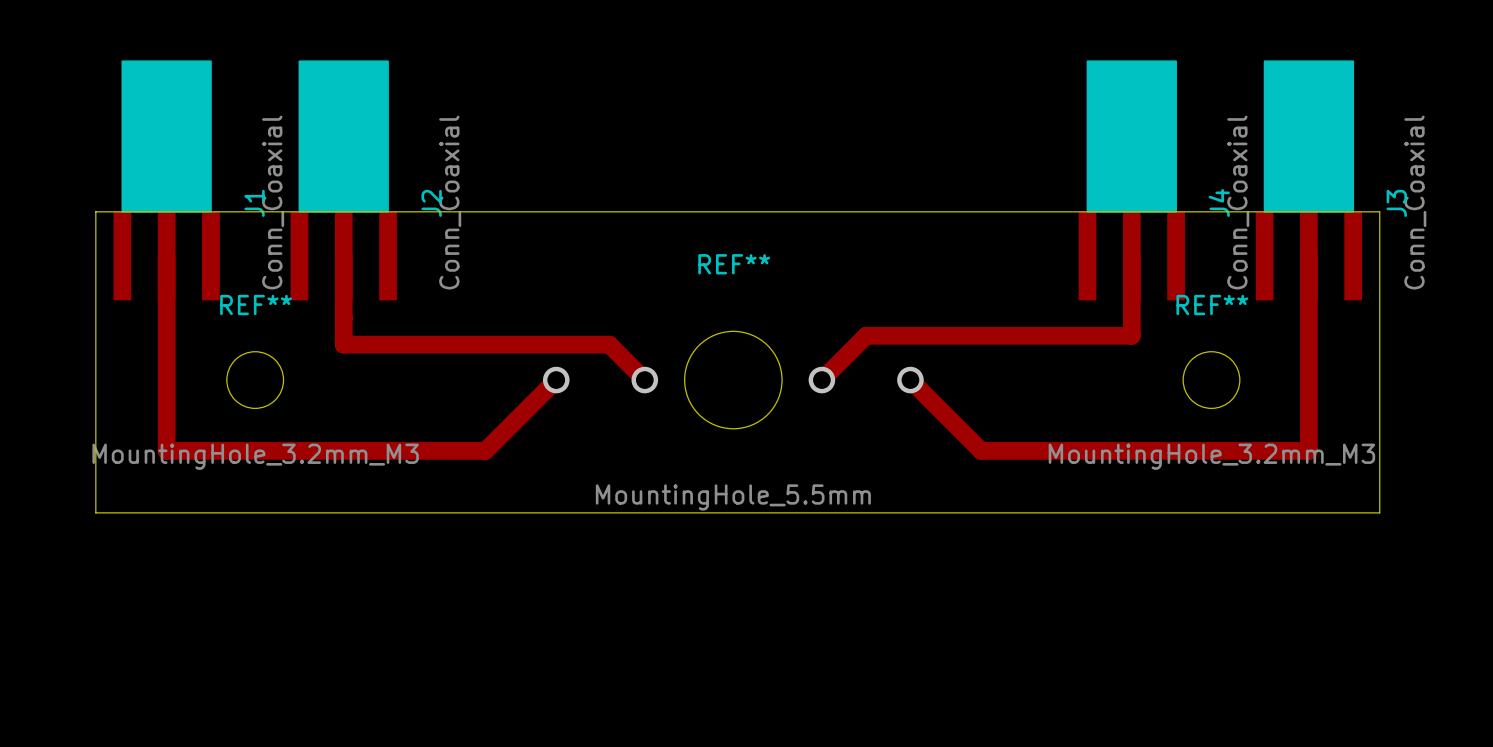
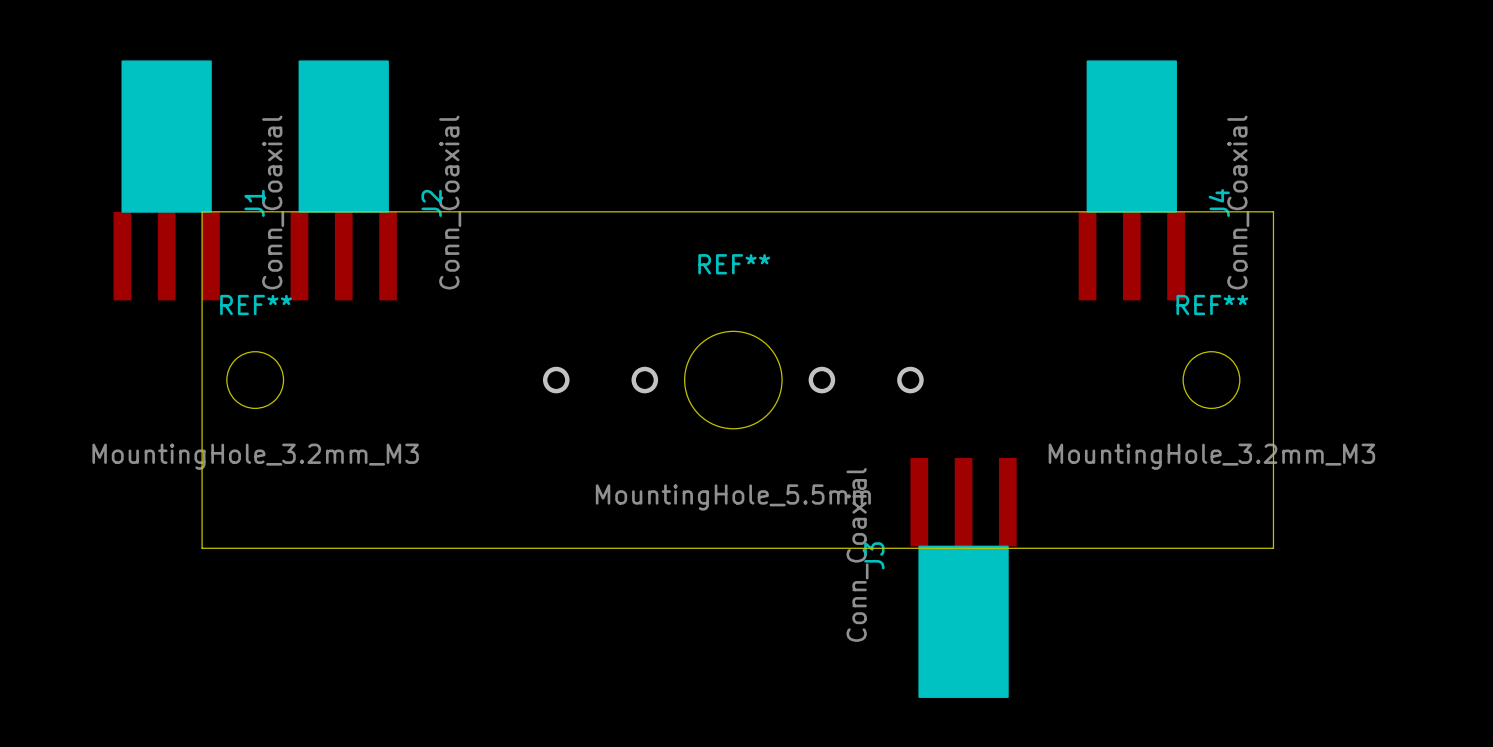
J3 rotation: 0° (1308, 180) -> 180° (963, 577)
J3 position: (1308, 180) -> (963, 577)
board edge: (202, 211) (95, 211) (95, 512) (1379, 512) (1379, 211) (1273, 211) -> (202, 211) (202, 548) (1273, 548) (1273, 211)
top track: (166, 256) (166, 450) (485, 450) (556, 380) -> none
top track: (343, 256) (343, 344) (609, 344) (644, 380) -> none
top track: (1131, 256) (1131, 335) (866, 335) (821, 380) -> none
top track: (1308, 256) (1308, 450) (981, 450) (910, 380) -> none

